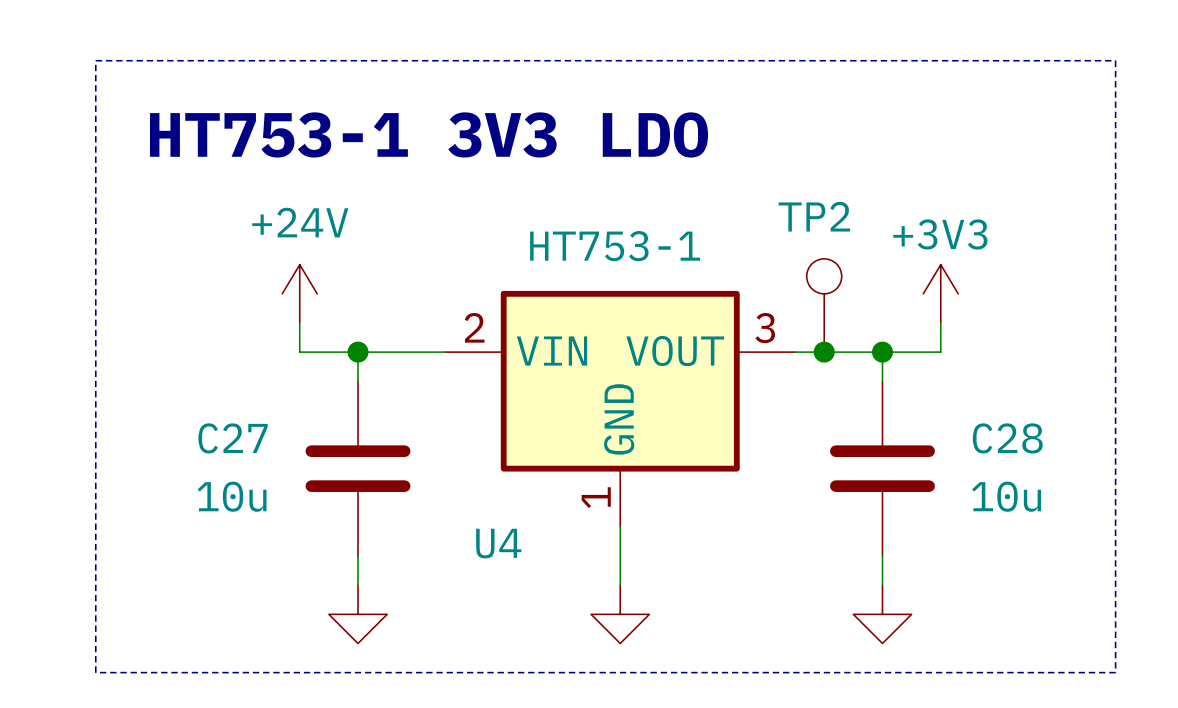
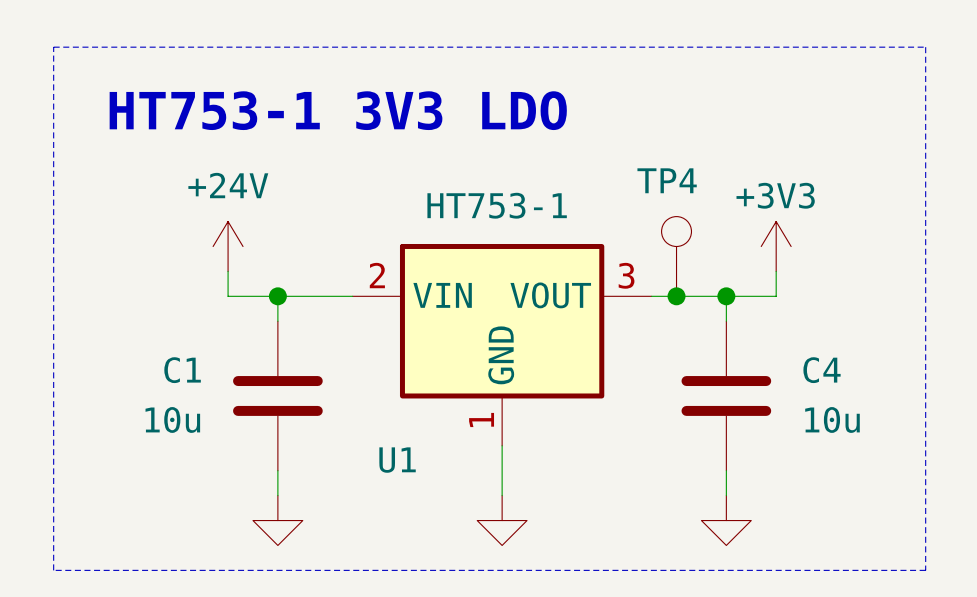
TP2 name: TP2 (814, 216) -> TP4 (667, 180)
C27 name: C27 (233, 438) -> C1 (182, 370)
C28 name: C28 (1007, 438) -> C4 (822, 370)
U4 name: U4 (498, 543) -> U1 (397, 460)

